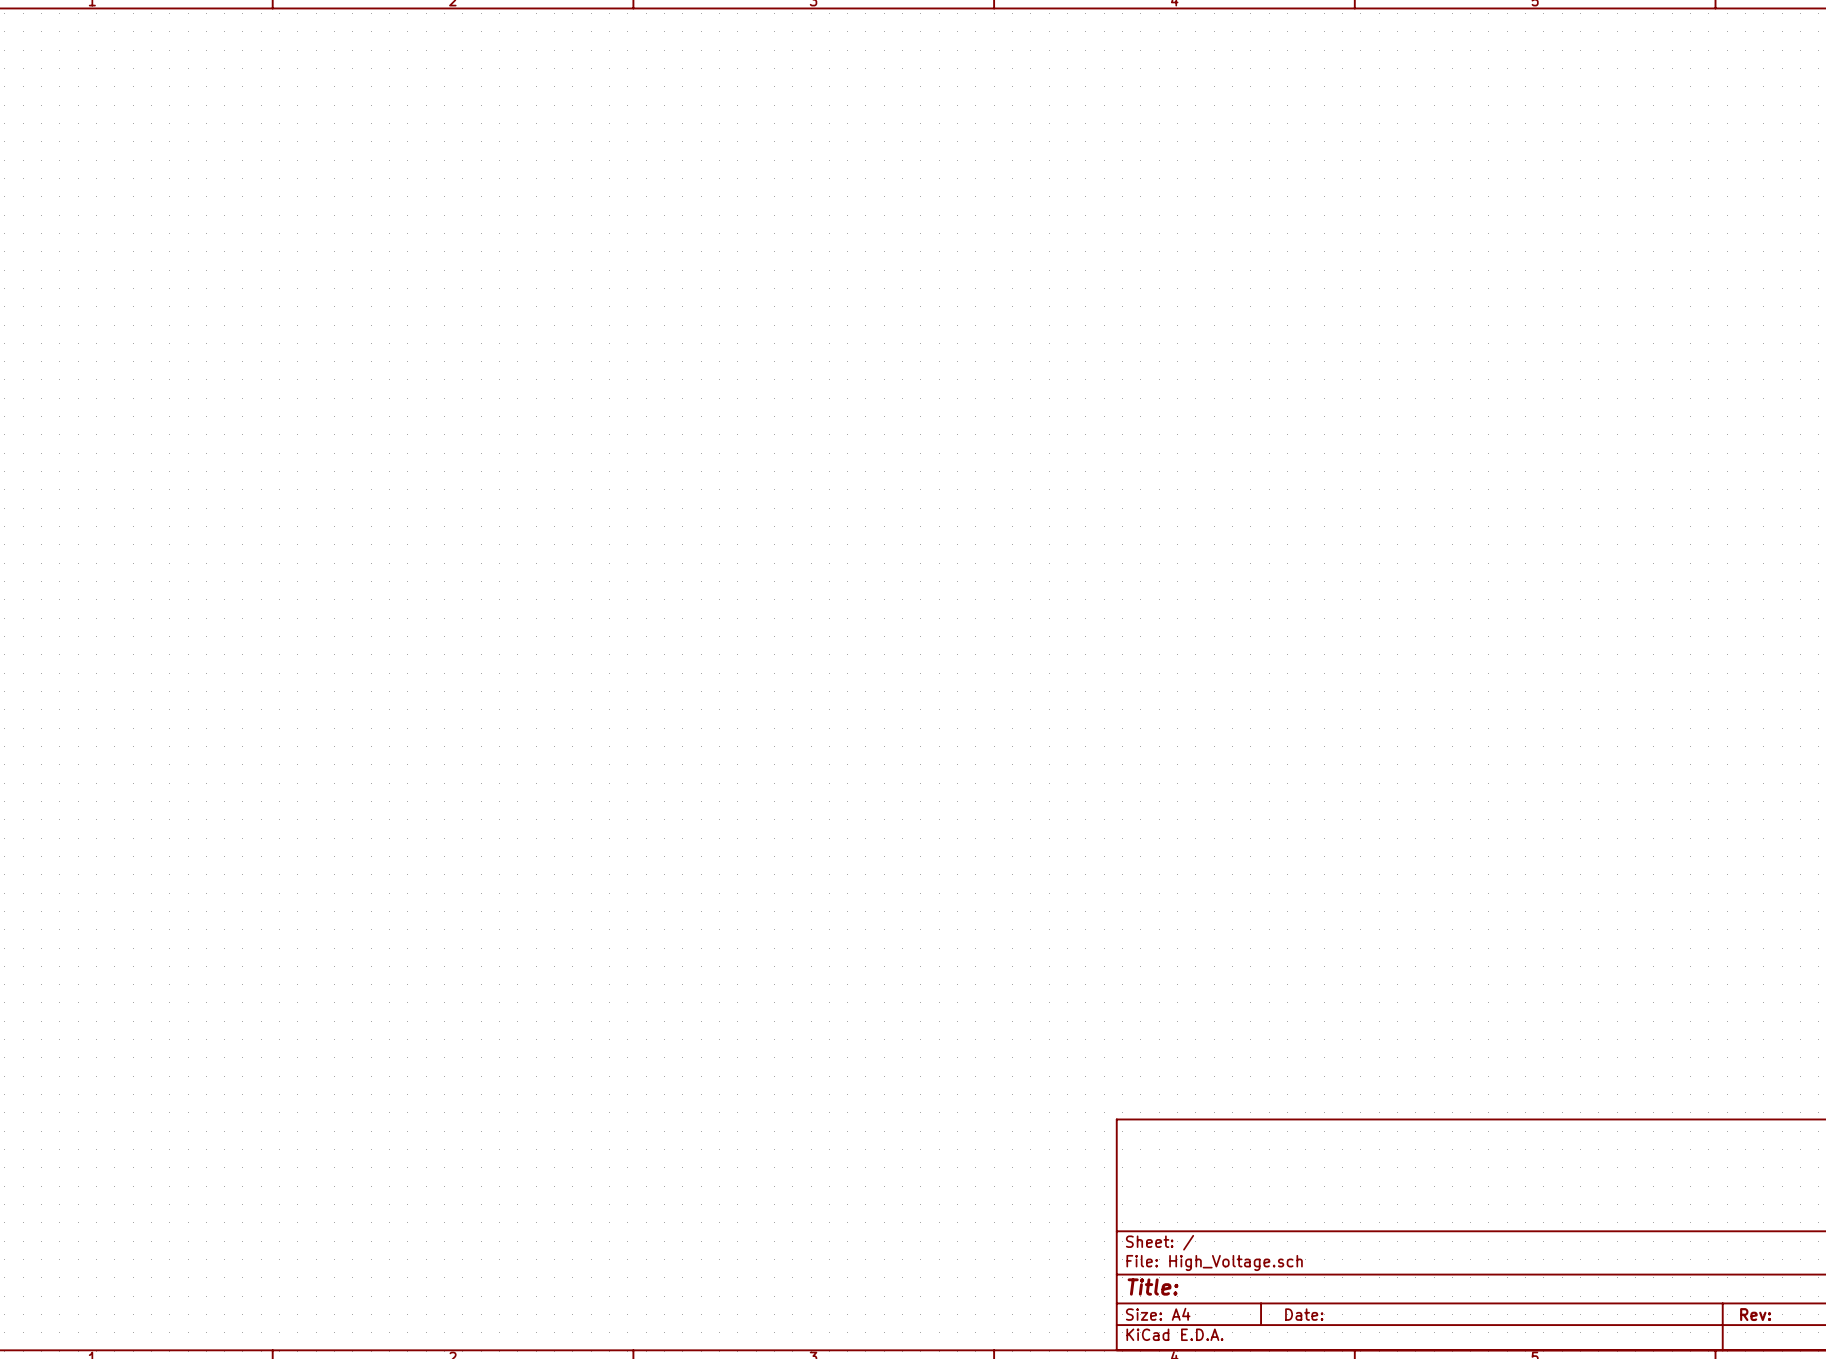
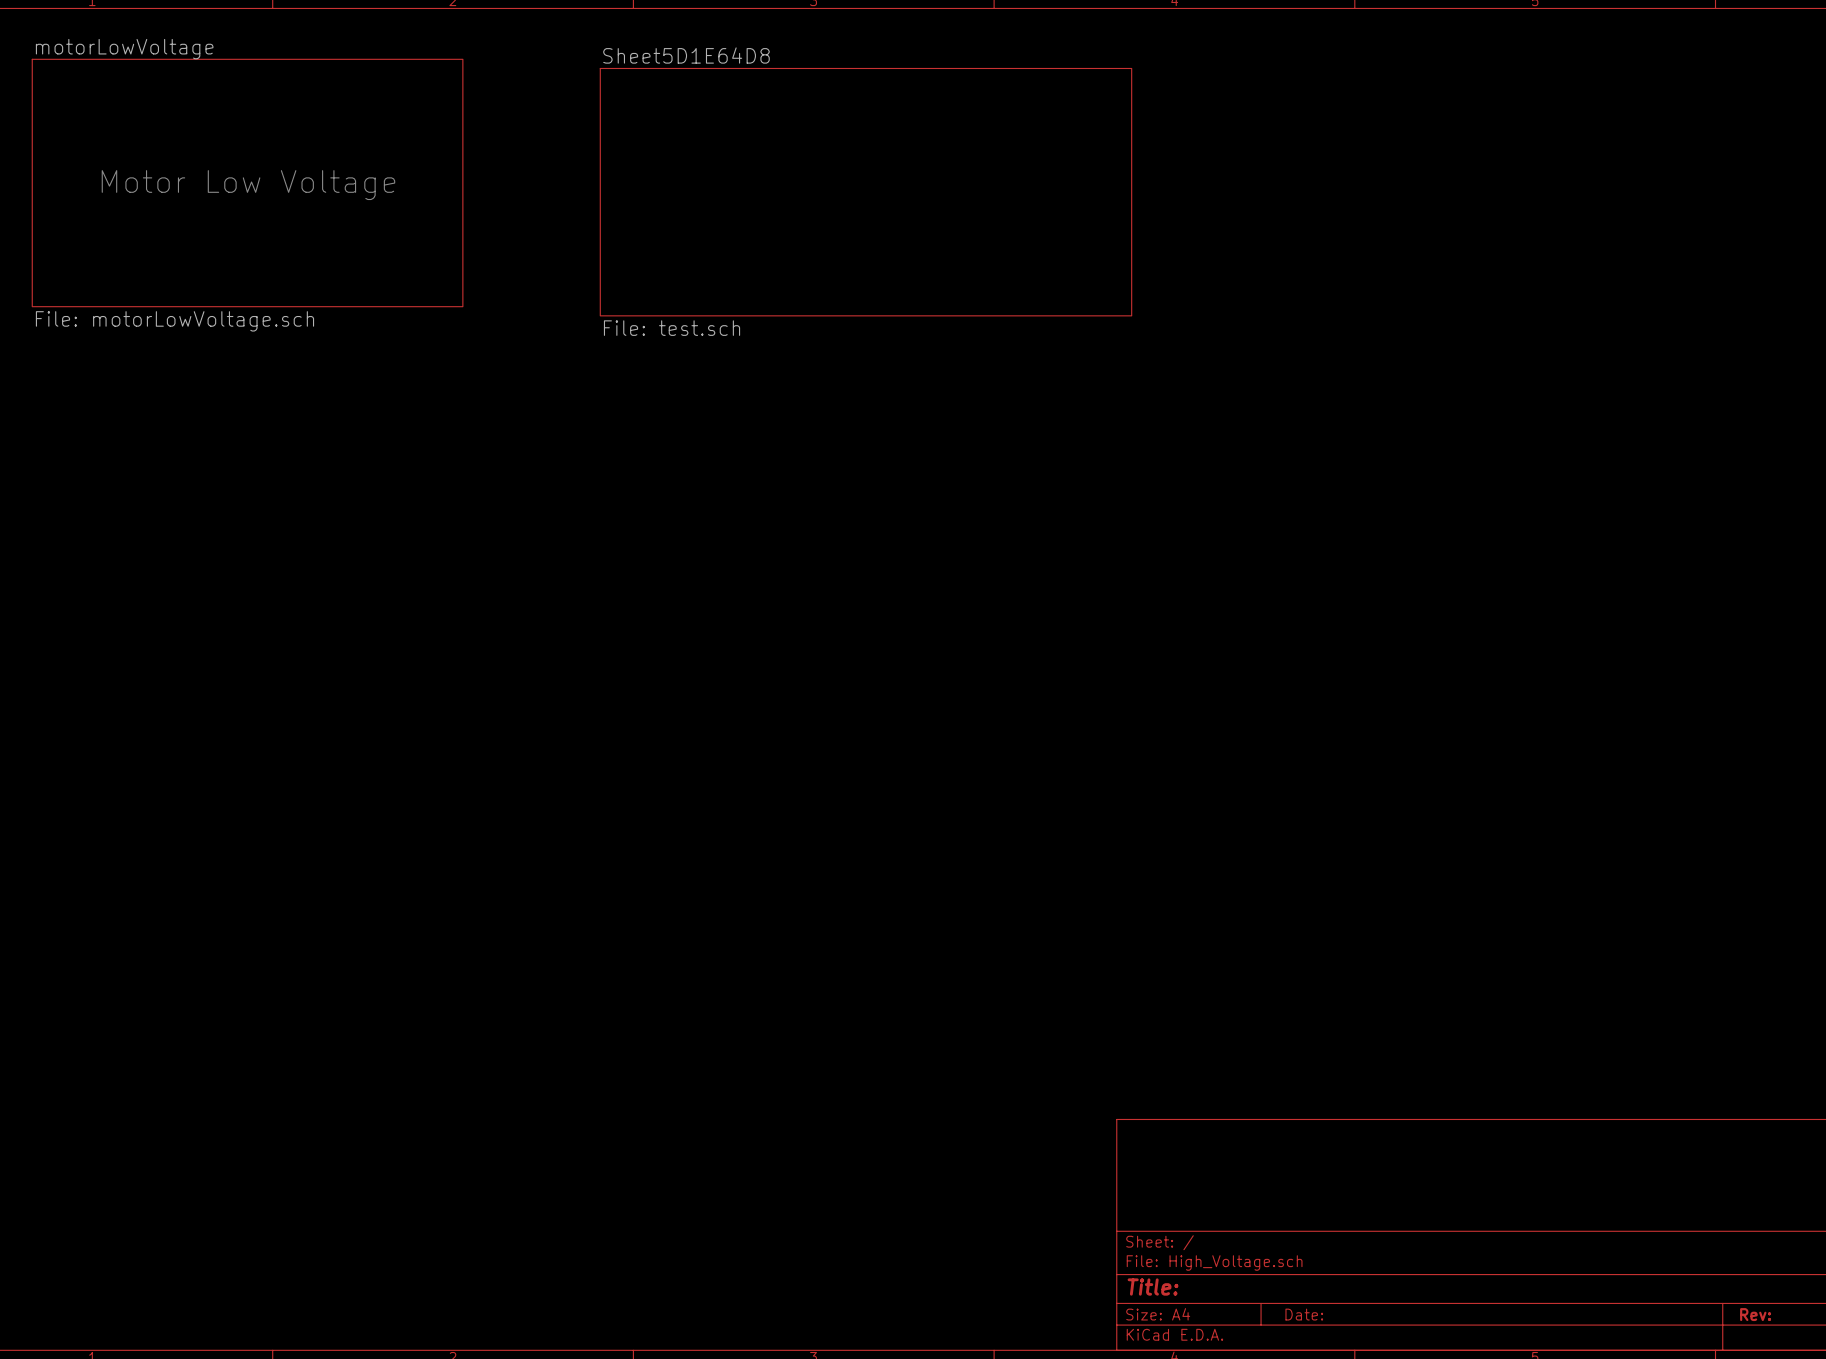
sheet motorLowVoltage: none -> File: motorLowVoltage.sch (247, 183)
text: none -> Motor Low Voltage (248, 185)
sheet Sheet5D1E64D8: none -> File: test.sch (865, 192)

